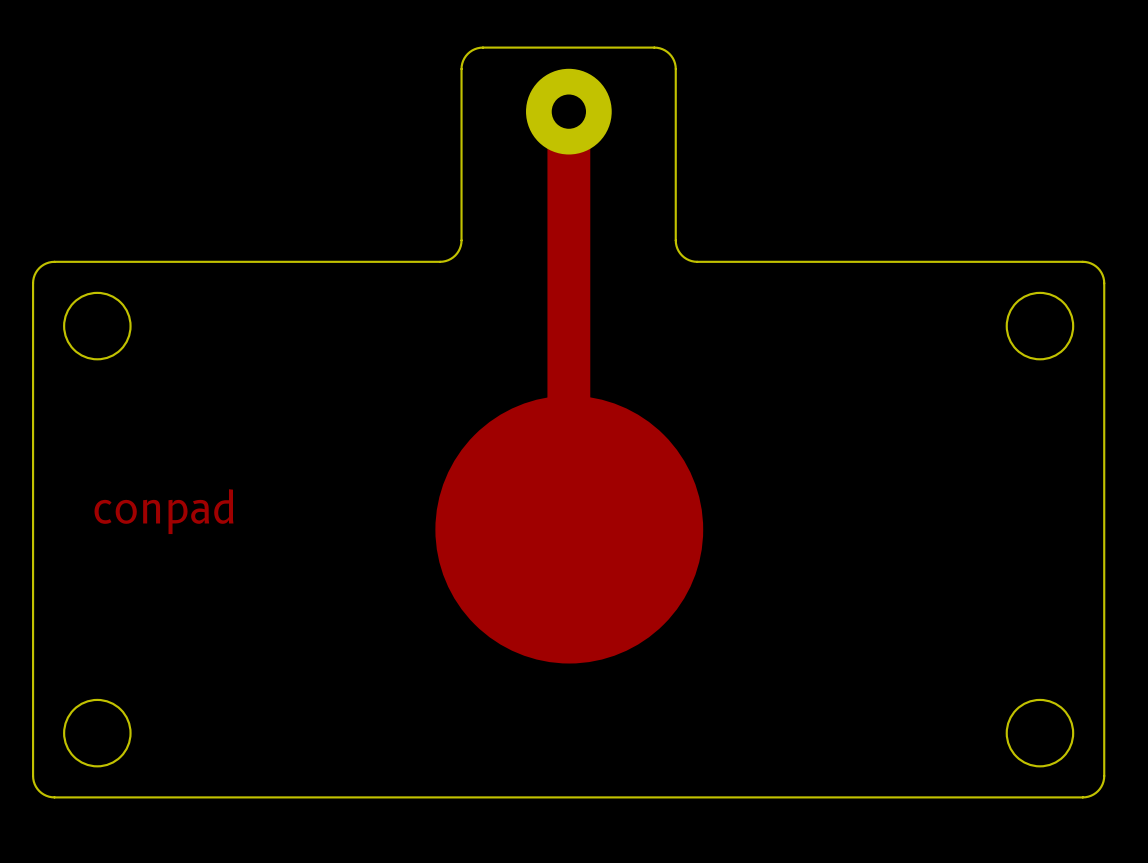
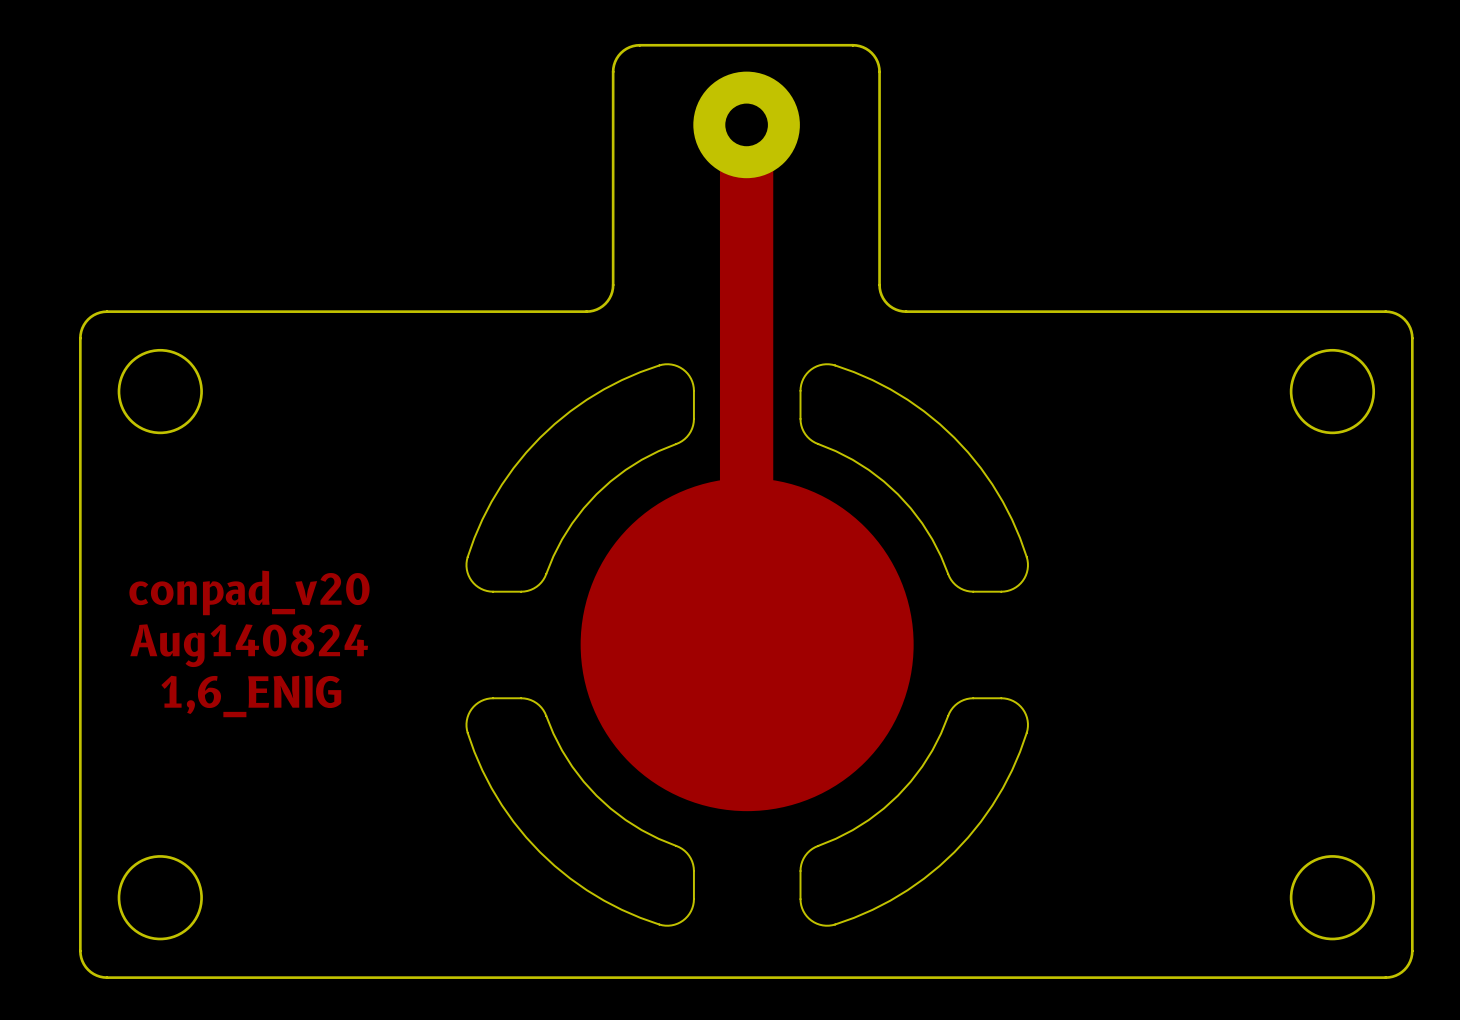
board edge: none -> (659, 365) (668, 364) (677, 366) (685, 371) (692, 381) (693, 422) (687, 436) (625, 469) (596, 494) (572, 523) (553, 556) (545, 576) (536, 586) (524, 591) (493, 591) (483, 590) (475, 585) (469, 578) (466, 566) (474, 538) (491, 501) (526, 452) (554, 424) (586, 399) (621, 380) (659, 365)
board edge: none -> (835, 365) (872, 380) (907, 399) (939, 424) (968, 452) (1002, 501) (1020, 538) (1027, 566) (1025, 575) (1018, 585) (1010, 590) (1001, 591) (970, 591) (957, 586) (949, 576) (941, 556) (922, 523) (897, 494) (868, 469) (807, 436) (800, 422) (802, 381) (806, 373) (816, 366) (825, 364) (835, 365)
text: conpad (163, 511) -> conpad_v20 (249, 592)
text: none -> Aug140824 (249, 645)
text: none -> 1,6_ENIG (251, 696)
board edge: none -> (493, 698) (524, 698) (536, 703) (545, 713) (553, 733) (572, 766) (596, 795) (625, 820) (687, 853) (693, 867) (693, 899) (691, 911) (685, 918) (674, 924) (662, 925) (621, 909) (570, 878) (526, 837) (491, 788) (474, 751) (466, 729) (467, 717) (473, 706) (483, 699) (493, 698)
board edge: none -> (973, 698) (1004, 698) (1013, 701) (1022, 709) (1027, 723) (1026, 732) (1012, 770) (980, 821) (939, 865) (890, 900) (835, 924) (822, 925) (811, 920) (803, 911) (800, 902) (800, 867) (805, 855) (815, 847) (835, 838) (868, 820) (897, 795) (922, 766) (932, 750) (953, 707) (960, 701) (973, 698)

